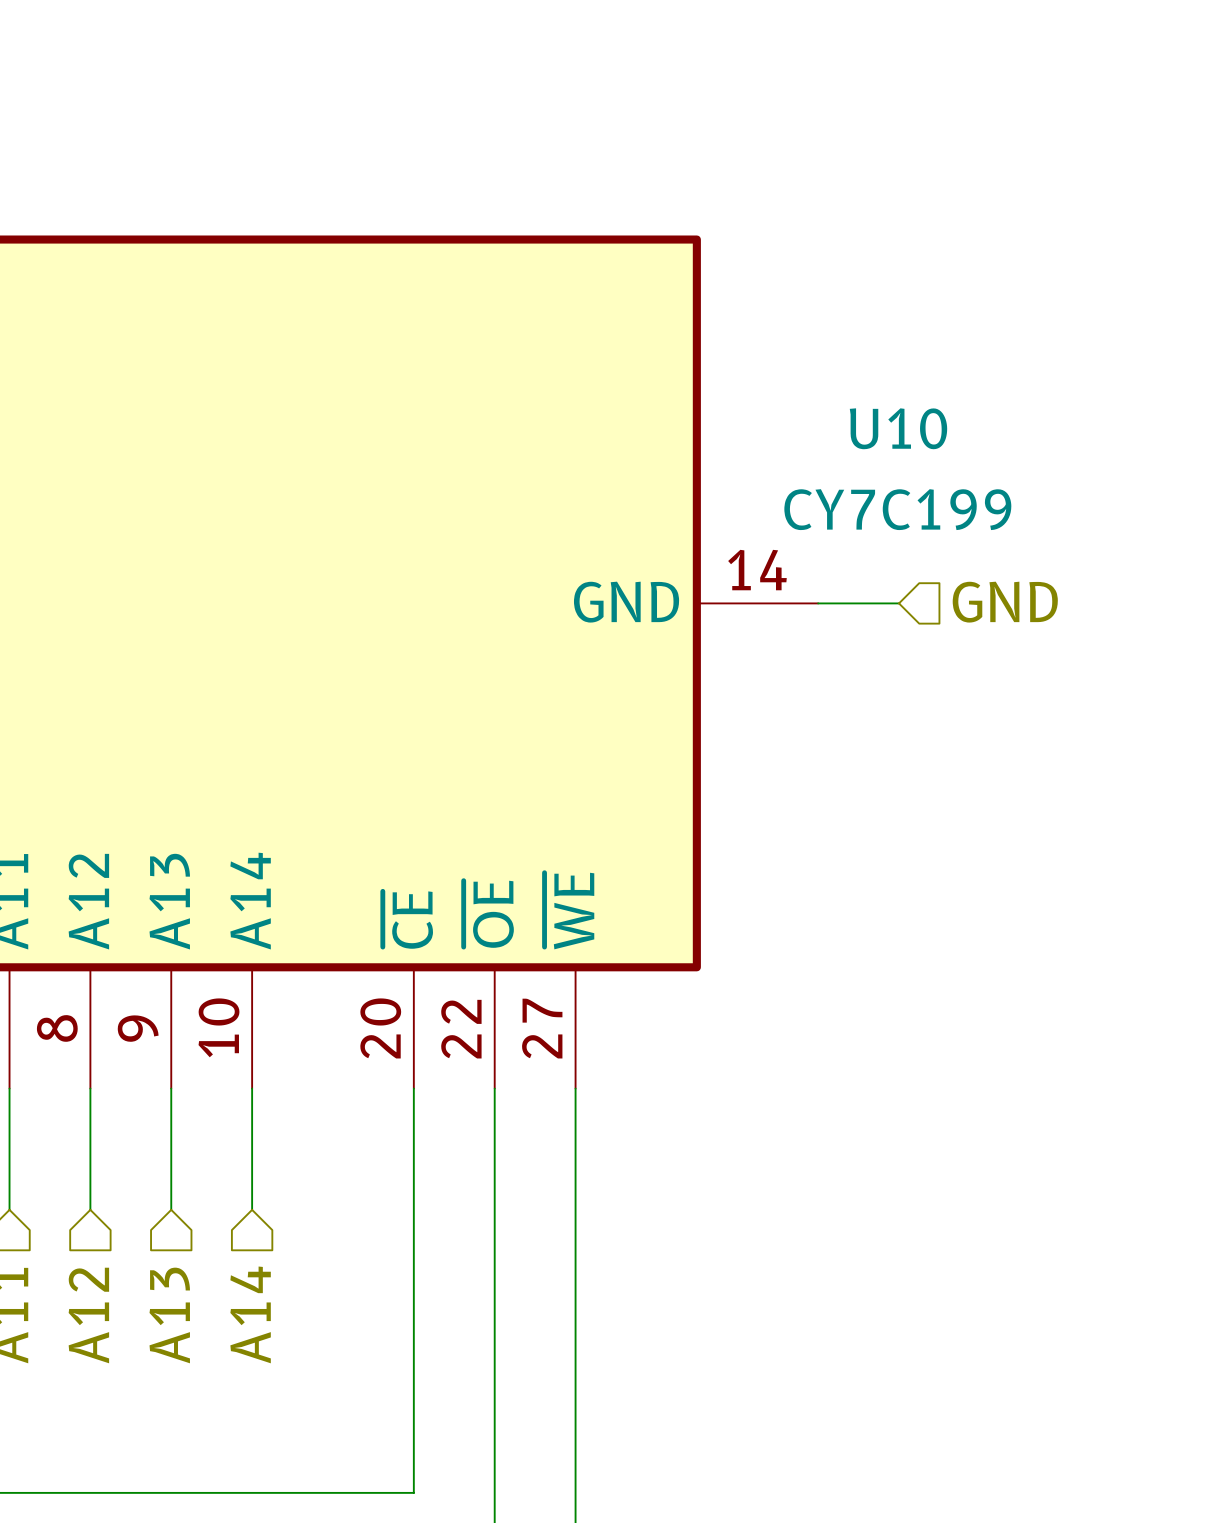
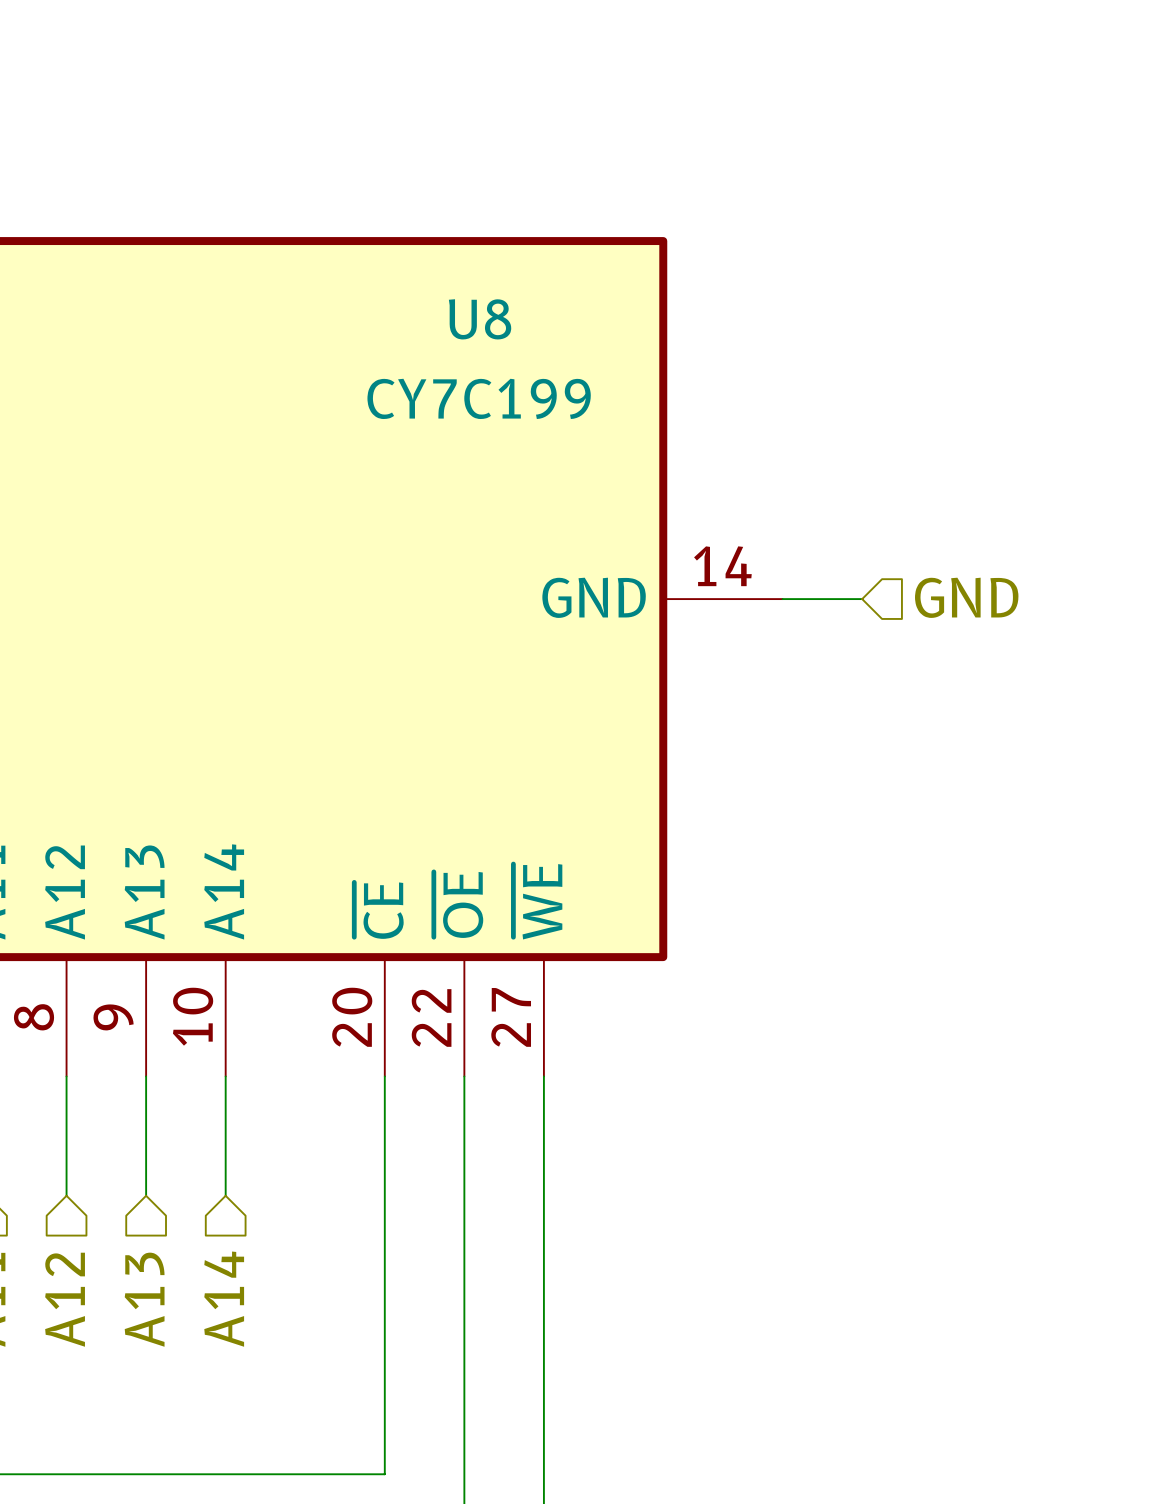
U10 name: U10 (898, 428) -> U8 (480, 319)
U10 value position: CY7C199 (897, 509) -> CY7C199 (479, 398)

